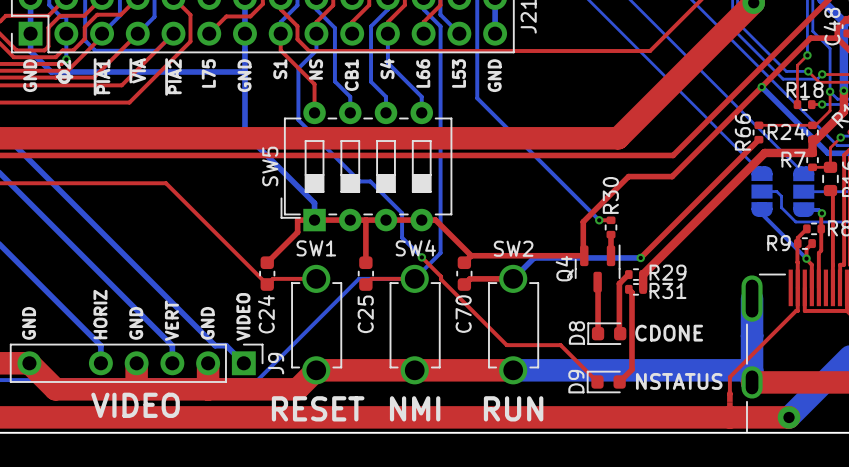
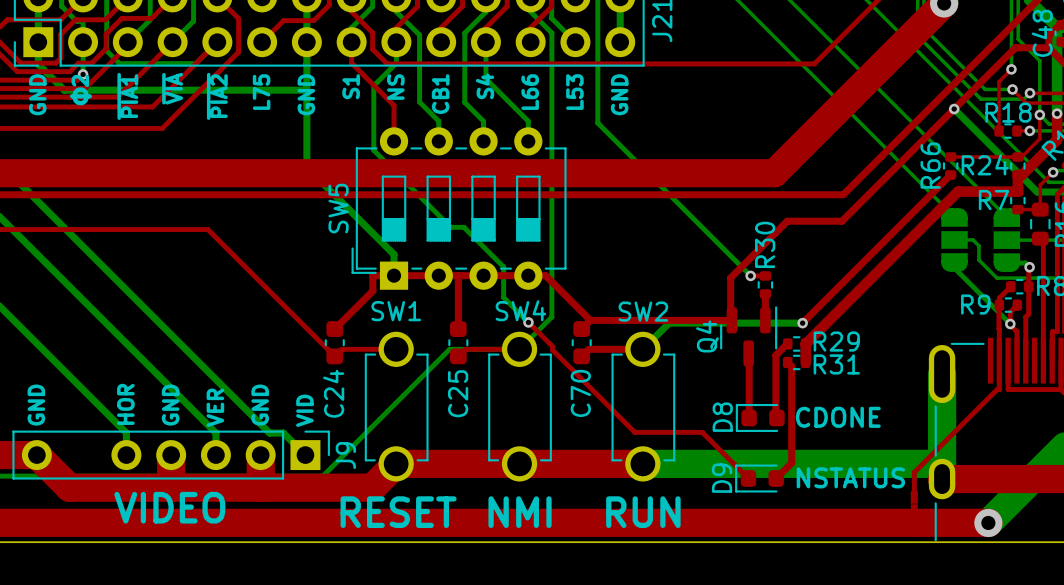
text: HORIZ (100, 314) -> HOR (125, 404)
text: VIDEO (243, 316) -> VID (304, 410)
text: VERT (171, 320) -> VER (215, 407)

